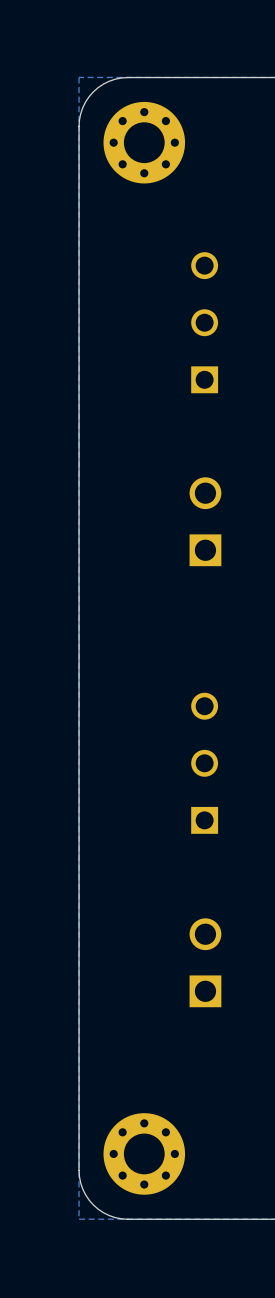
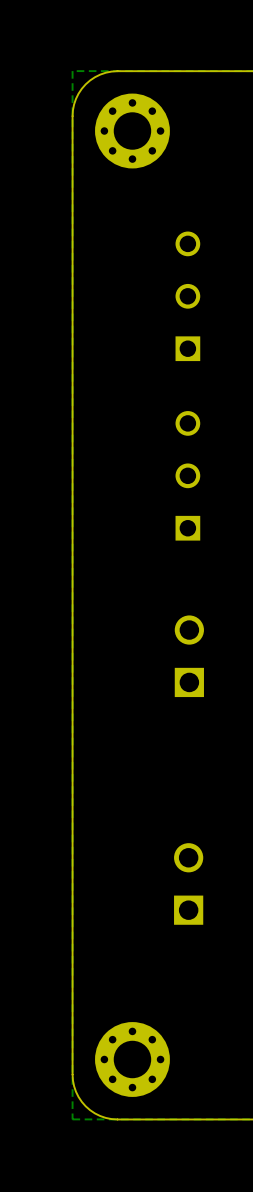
part footprint: [189, 477, 222, 567] -> [175, 411, 201, 541]
part: none -> (189, 656)
part: (204, 763) -> none

